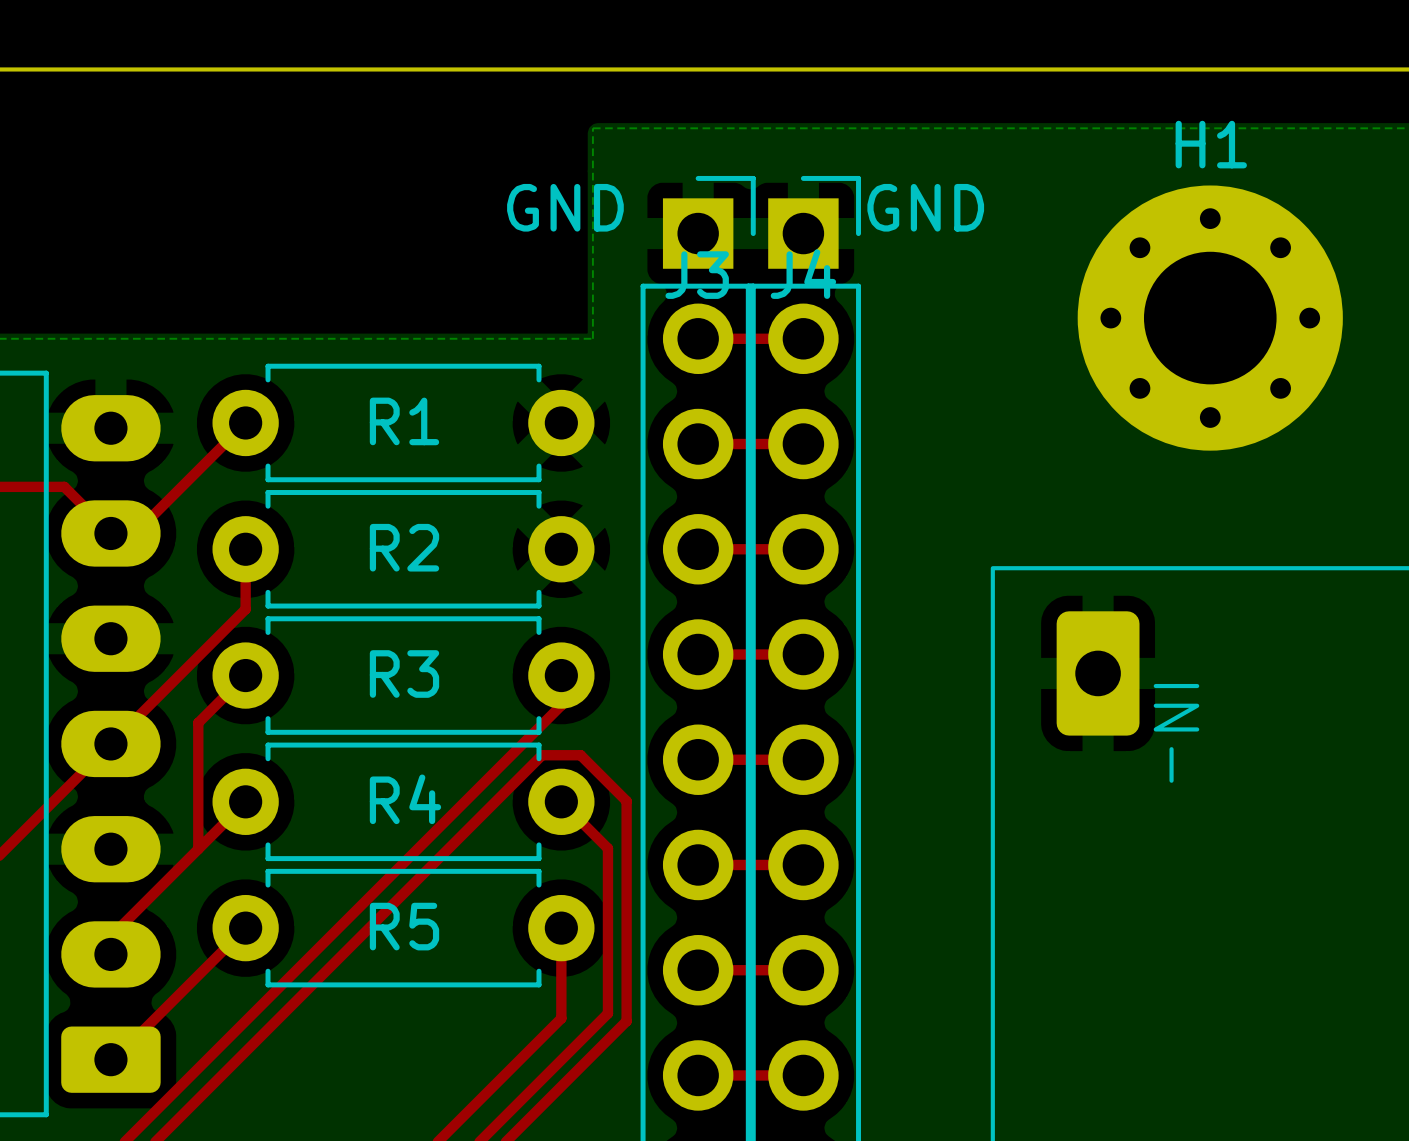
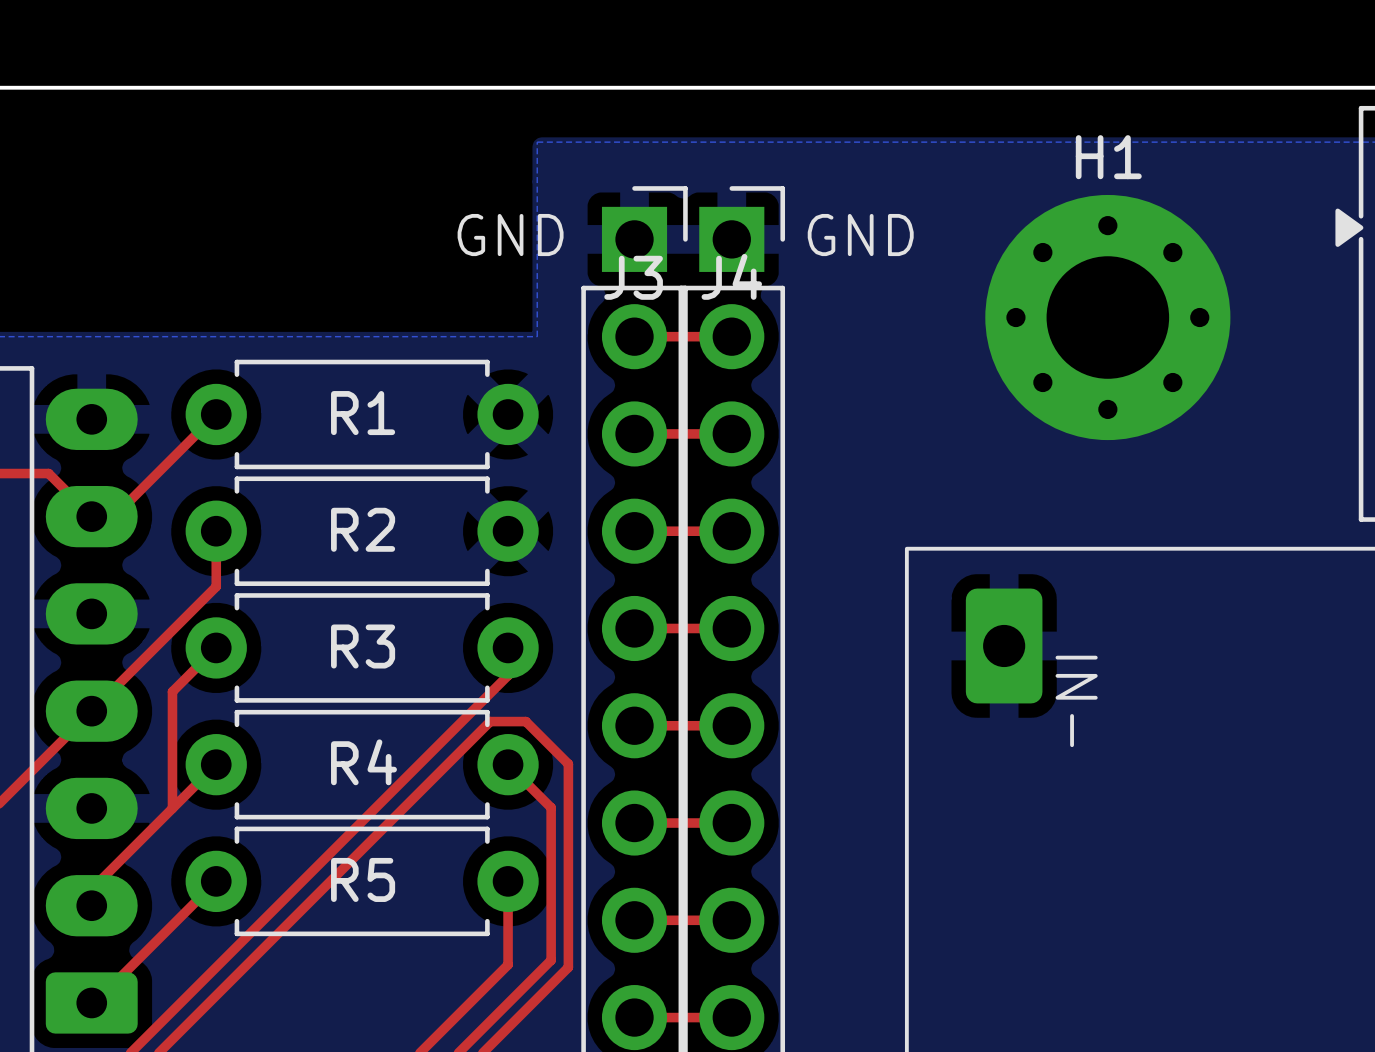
text: GND (565, 207) -> GND GND (685, 235)
text: GND (925, 207) -> none

